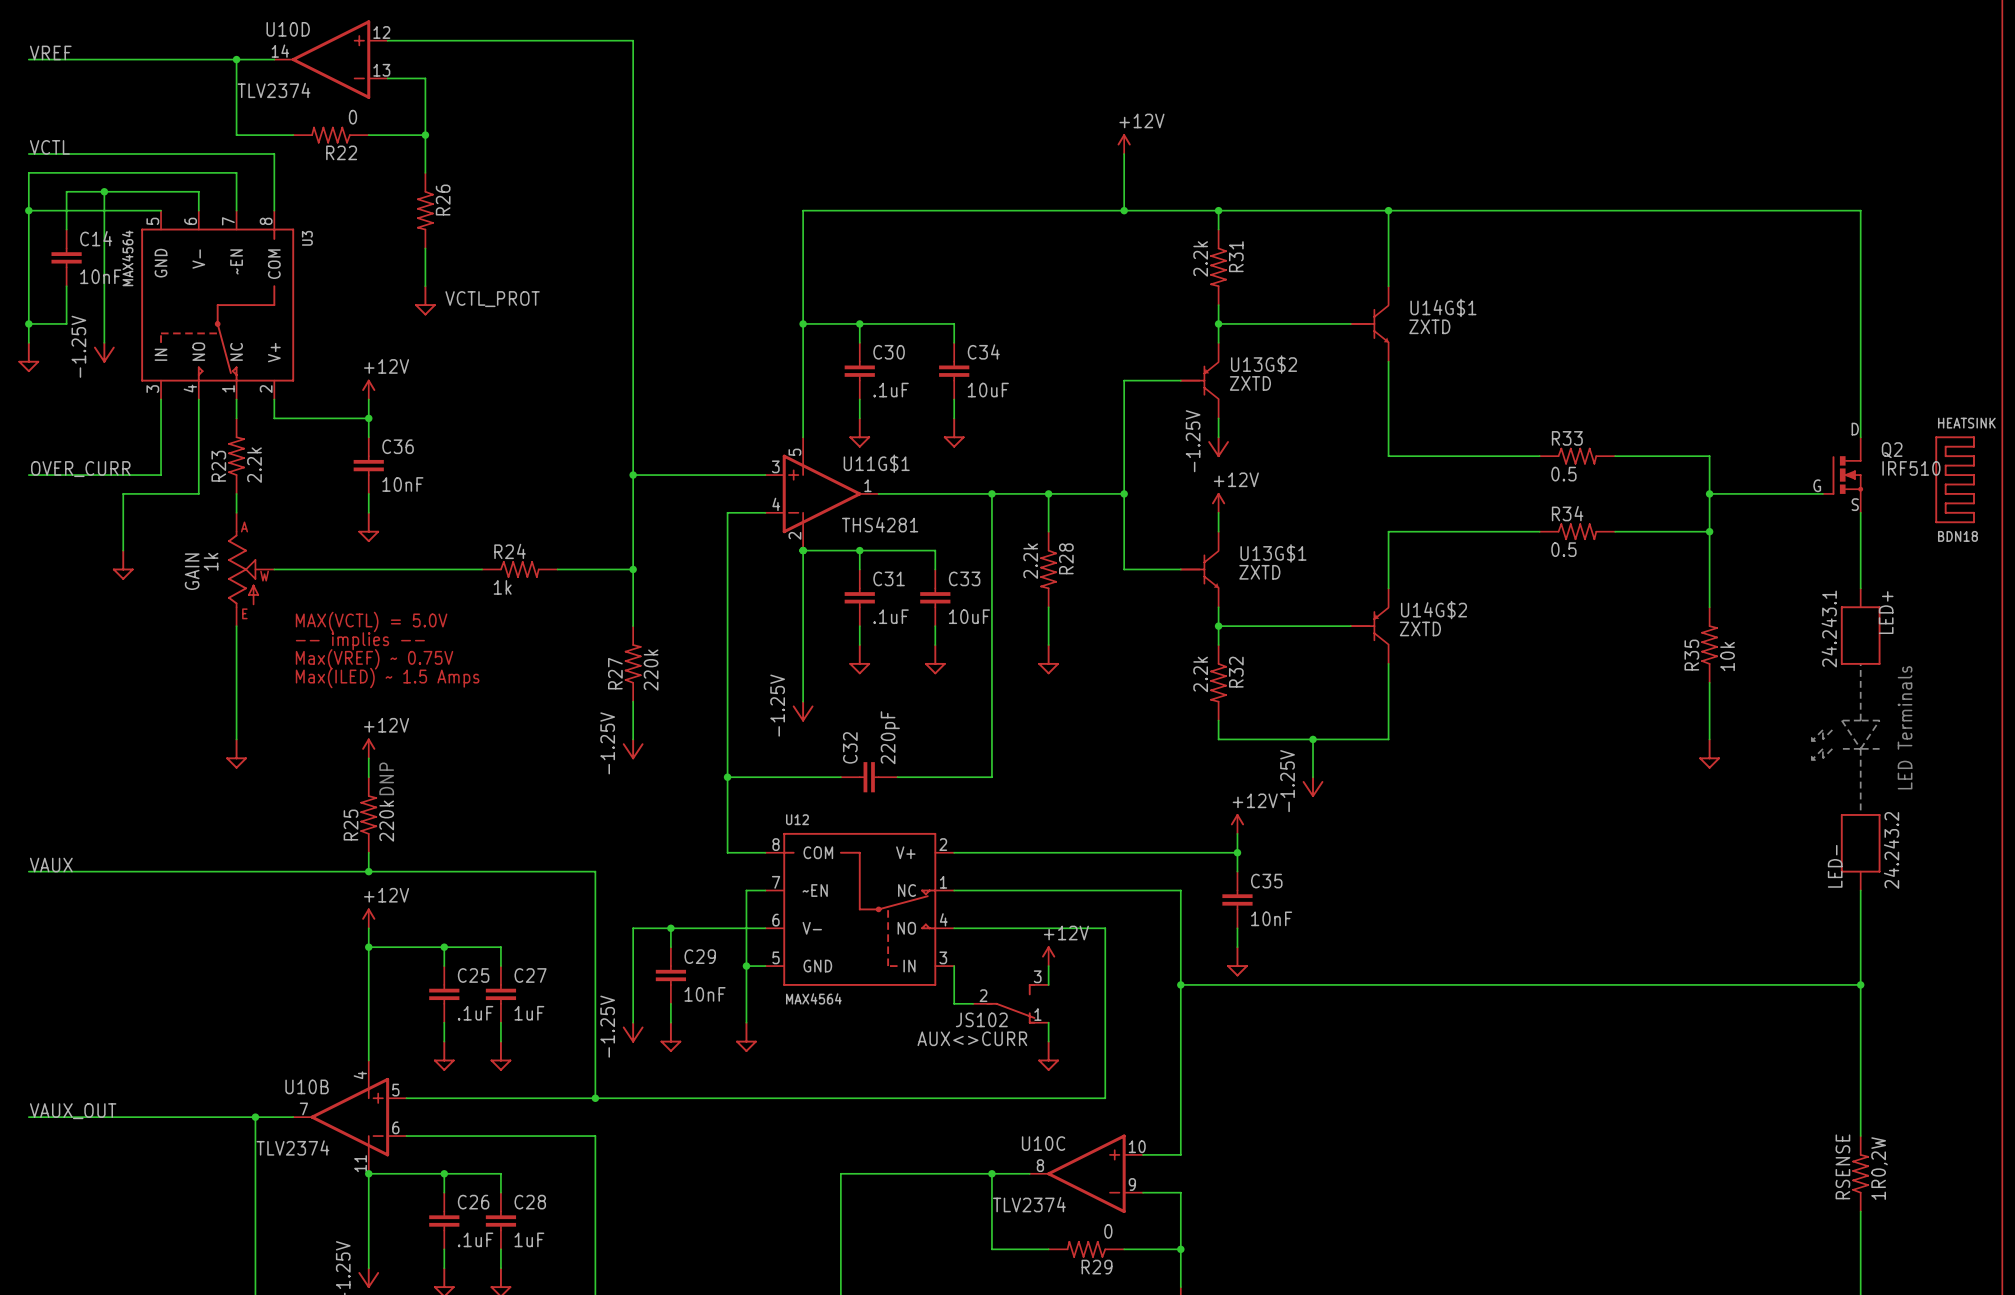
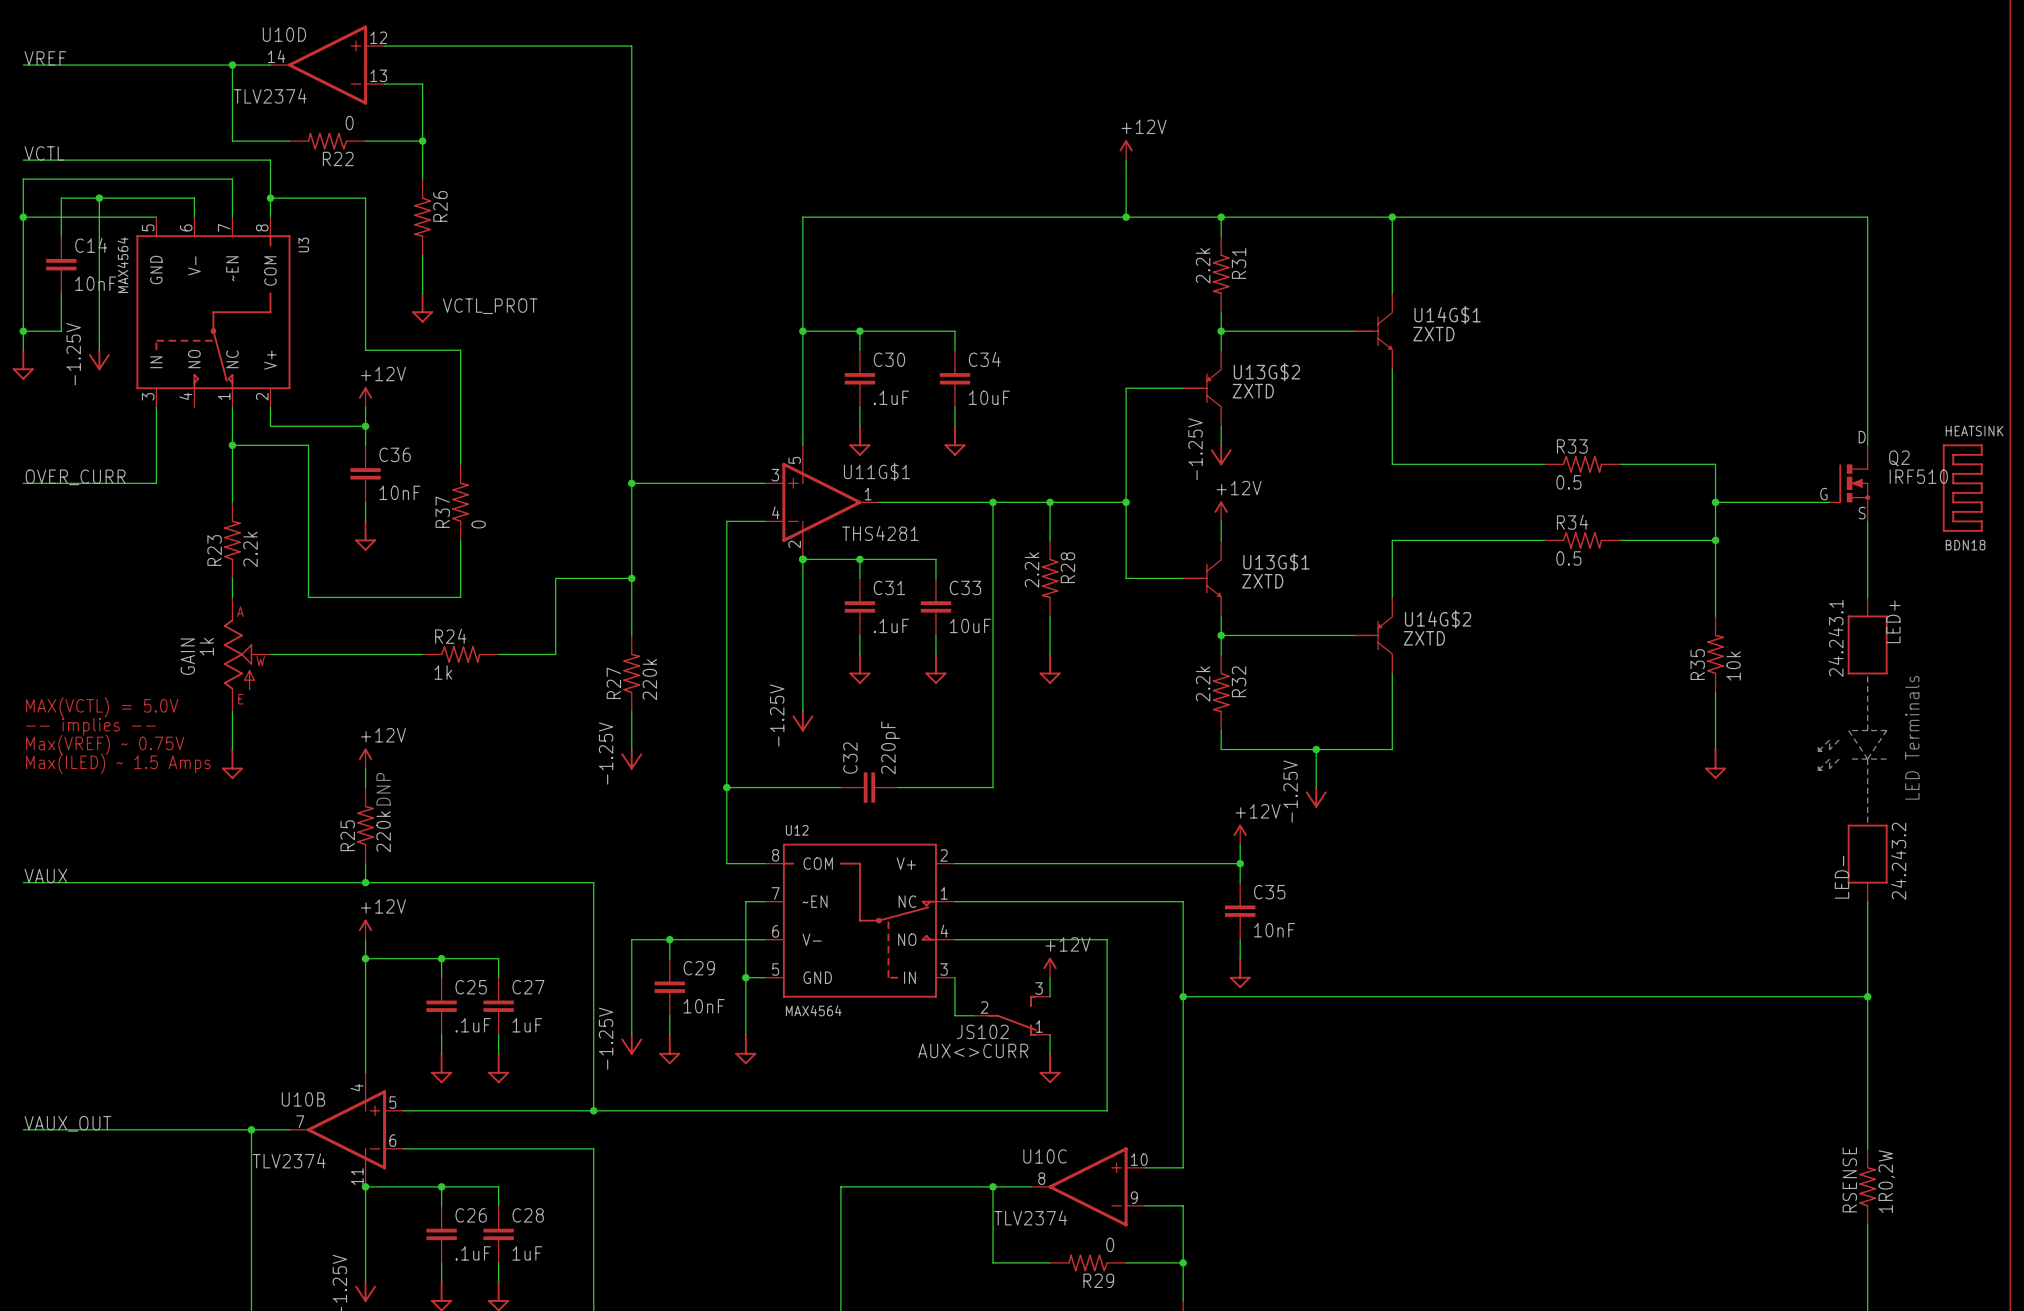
wire: none -> (270, 198) (365, 198) (365, 350) (460, 350) (460, 464)
junction: none -> (270, 198)
wire: (198, 399) (198, 493) (123, 493) (123, 550) -> none
wire: none -> (232, 445) (308, 445) (308, 597) (460, 597) (460, 540)
junction: none -> (232, 445)
R23 position: (236, 456) -> (232, 540)
R37: none -> 0 (460, 502)
part: (123, 564) -> none
wire: none -> (232, 578) (232, 597)
GAIN position: (251, 569) -> (247, 654)
wire: (274, 569) (482, 569) -> none
R24 position: (519, 569) -> (460, 654)
wire: none -> (555, 578) (555, 654) (498, 654)
text: MAX(VCTL) = 5.0V (371, 621) -> none
wire: (236, 626) (236, 701) -> none
text: -- implies -- (360, 641) -> none
wire: none -> (270, 654) (422, 654)
text: Max(VREF) ~ 0.75V (374, 659) -> none
text: Max(ILED) ~ 1.5 Amps (387, 678) -> none
text: none -> MAX(VCTL) = 5.0V (102, 707)
text: none -> -- implies -- (90, 726)
text: none -> Max(VREF) ~ 0.75V (105, 744)
text: none -> Max(ILED) ~ 1.5 Amps (118, 763)

